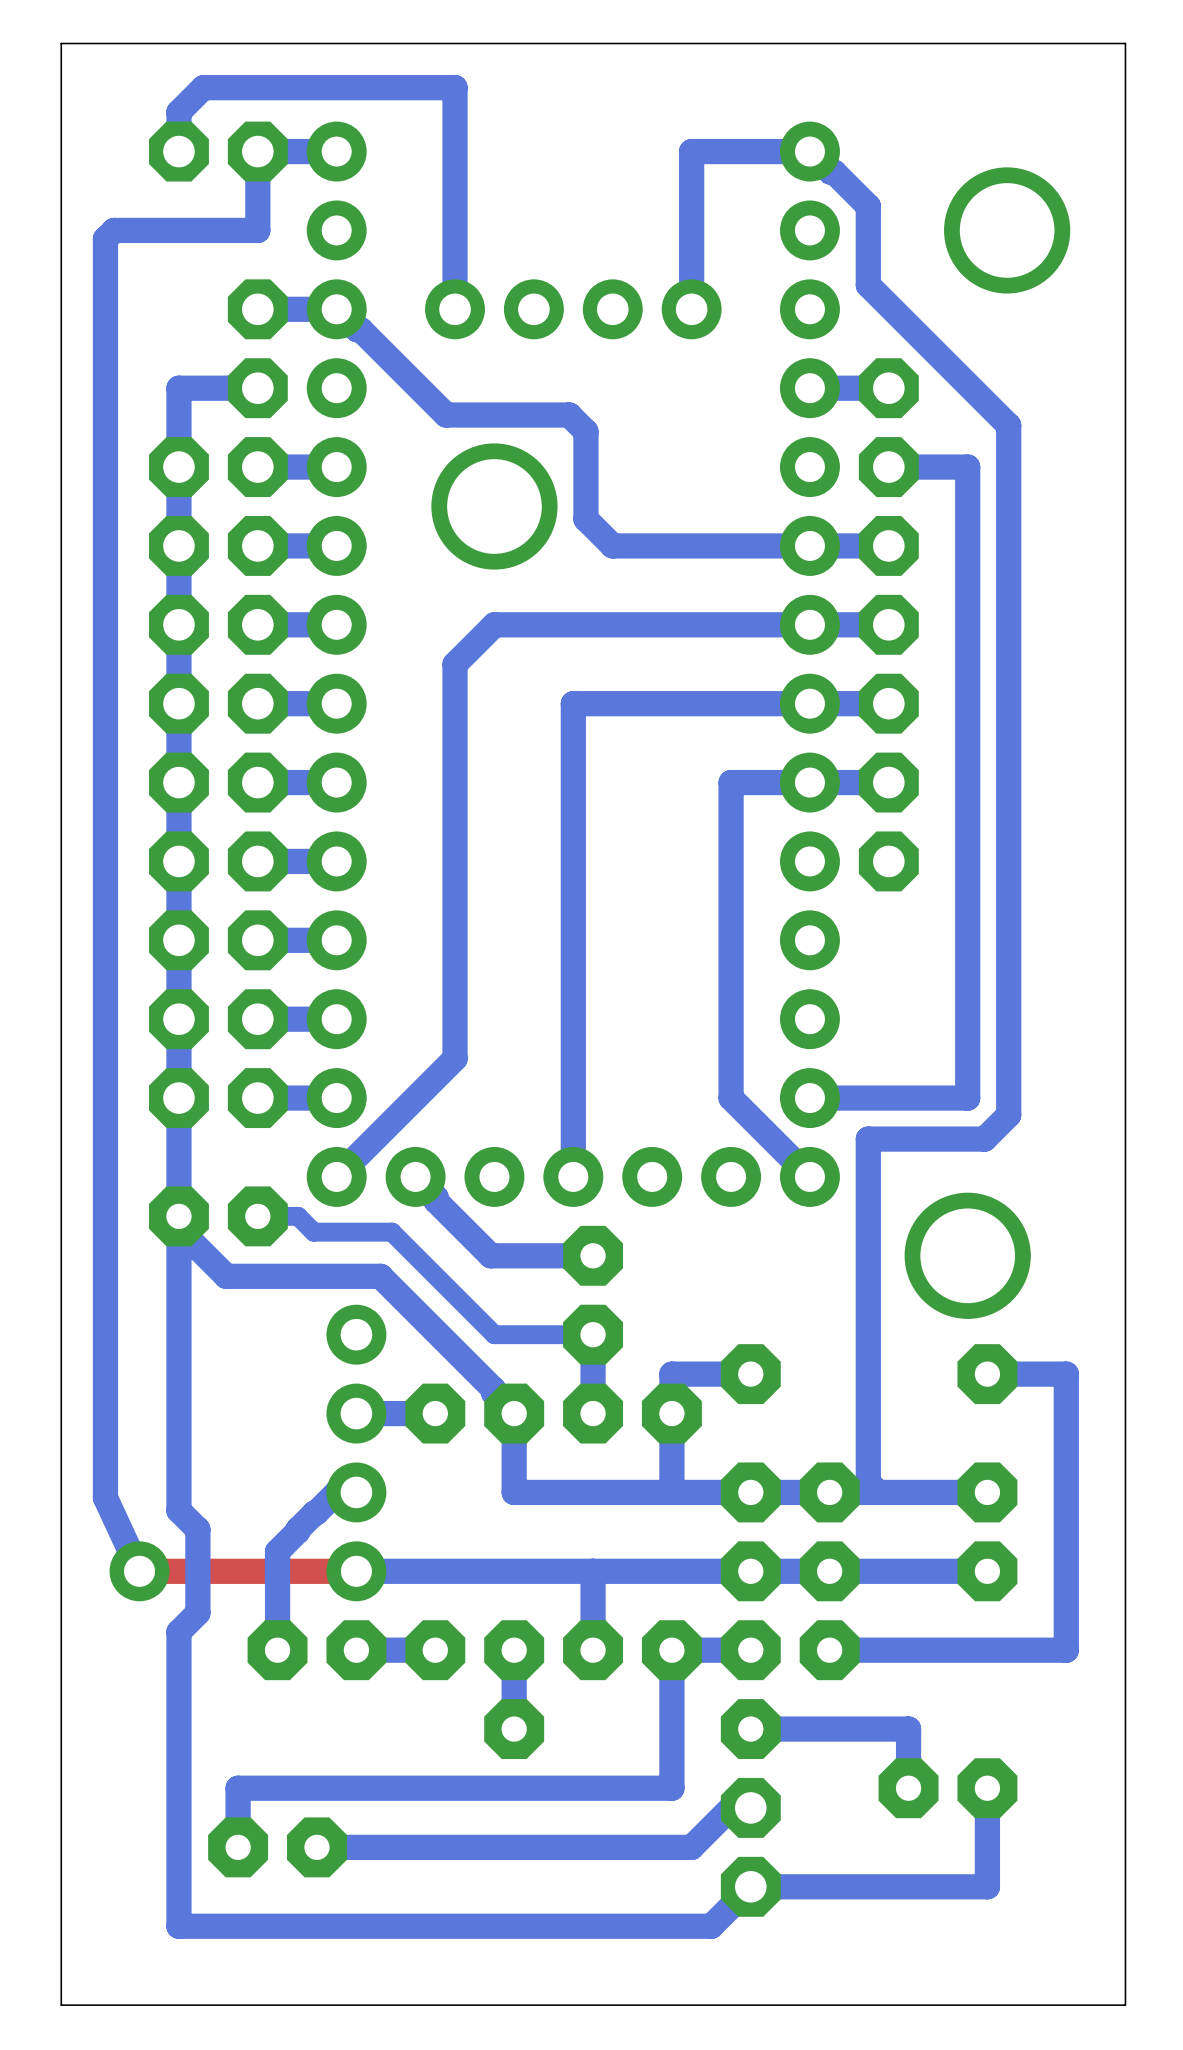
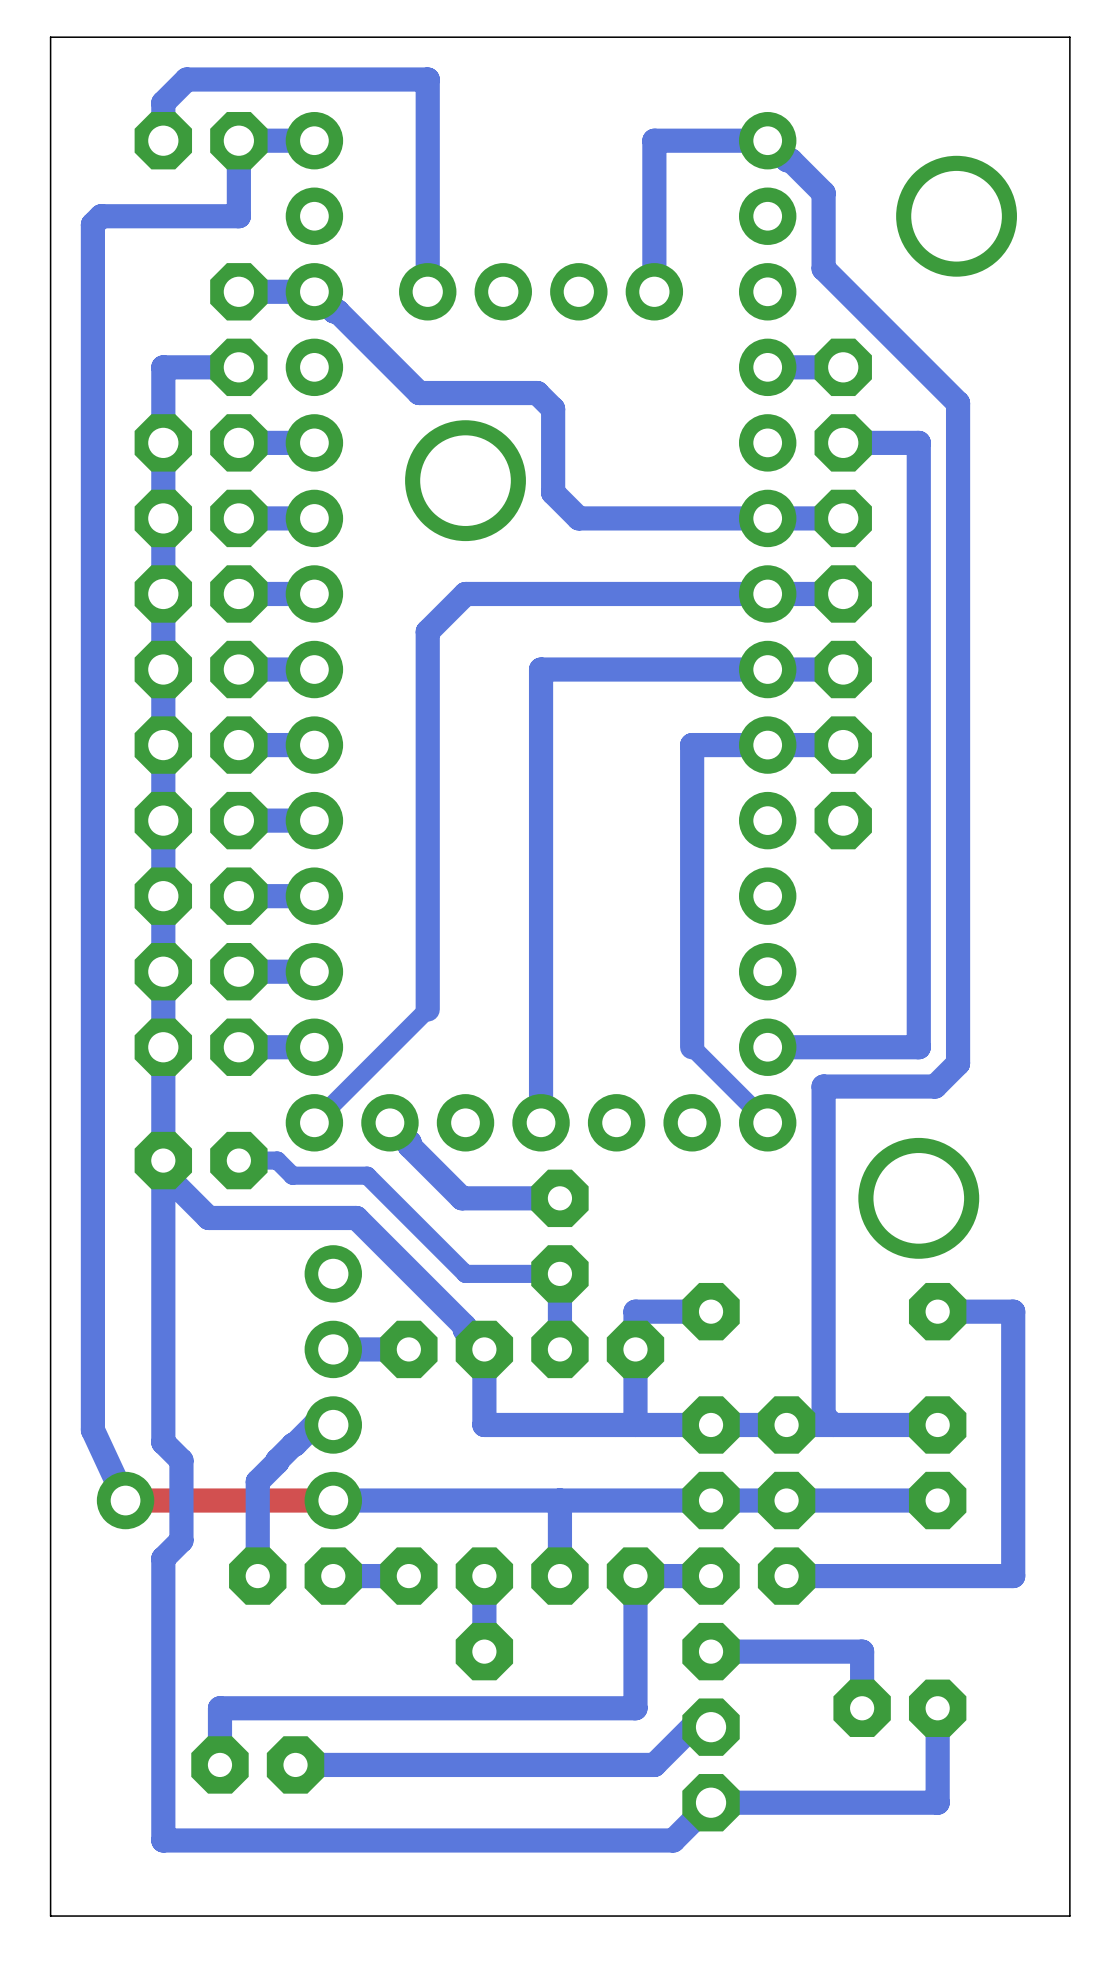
bottom track width: thick (455, 1058) (336, 1176) -> thin (427, 1009) (314, 1122)
bottom track width: thick (731, 1098) (809, 1176) -> thin (692, 1047) (767, 1122)

